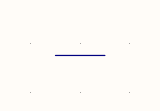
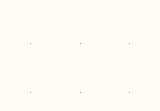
line: (55, 55) (104, 55) -> none

